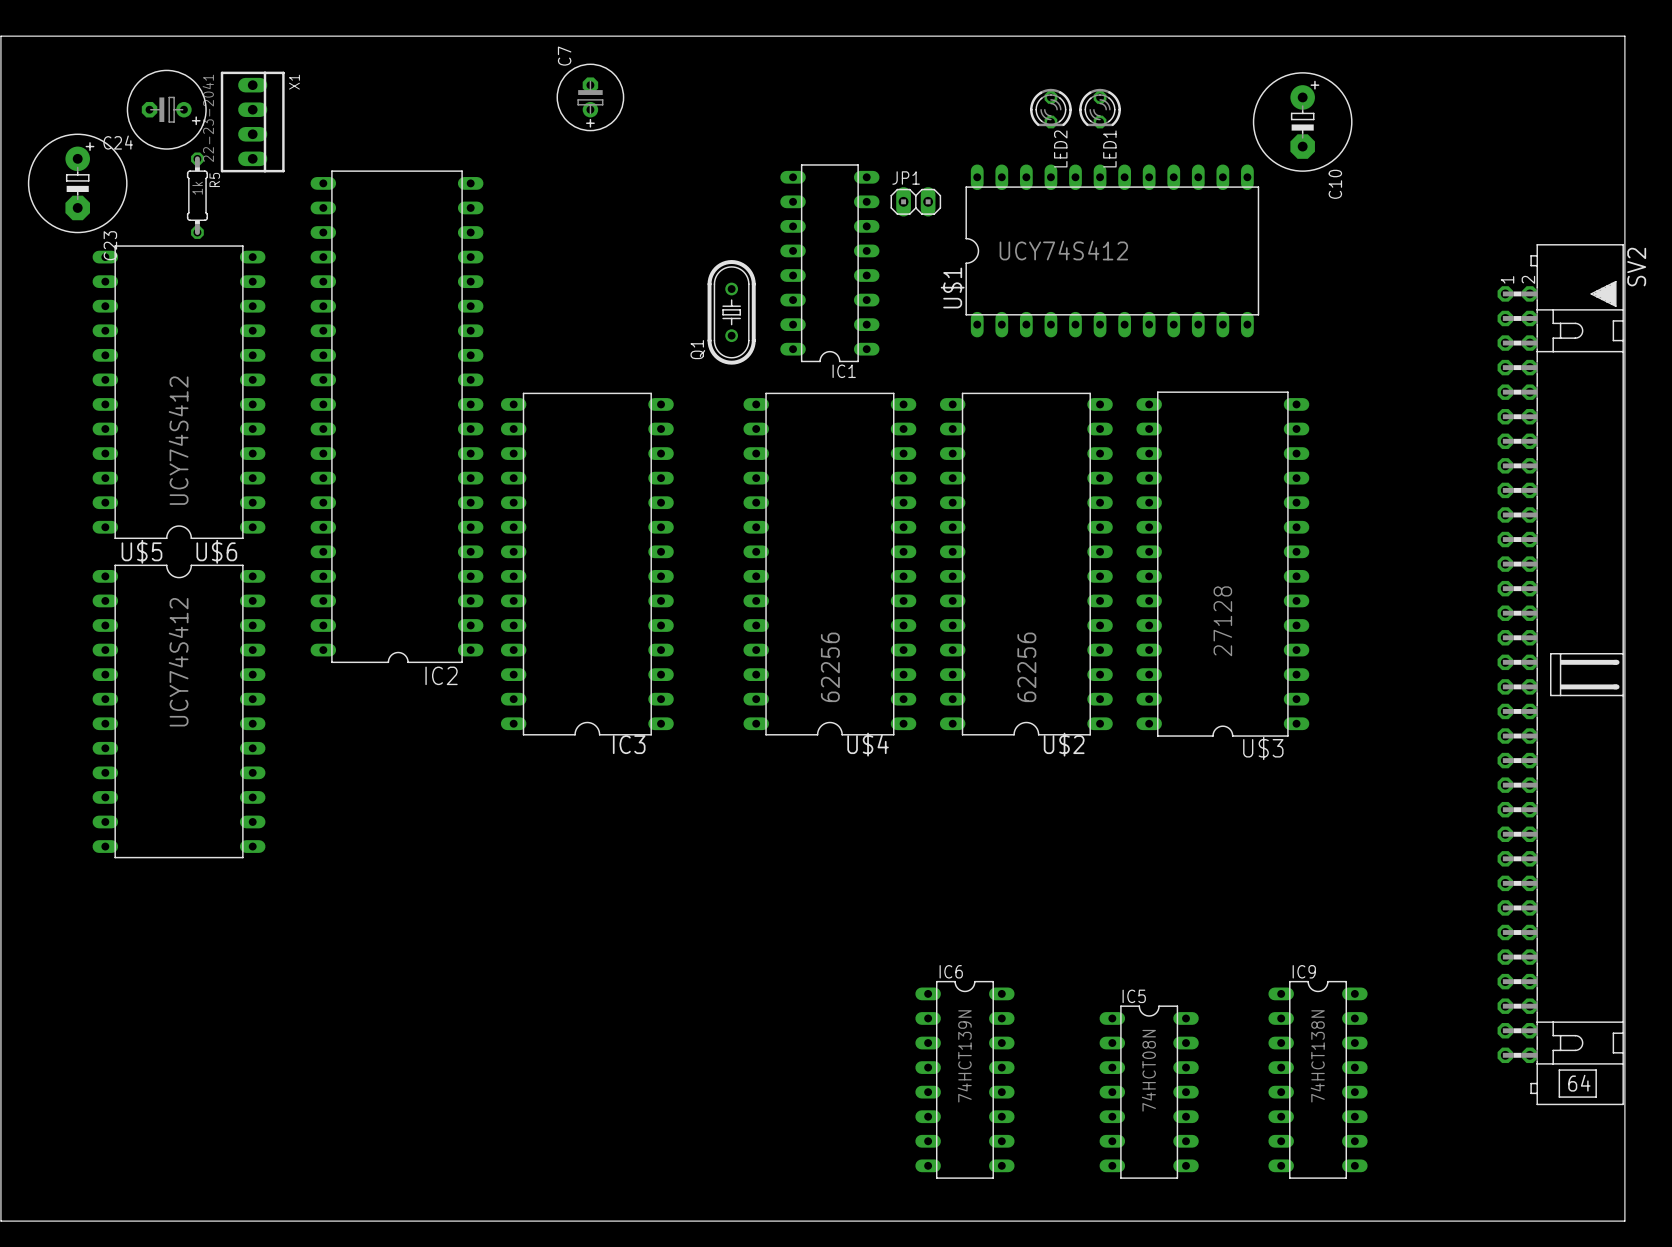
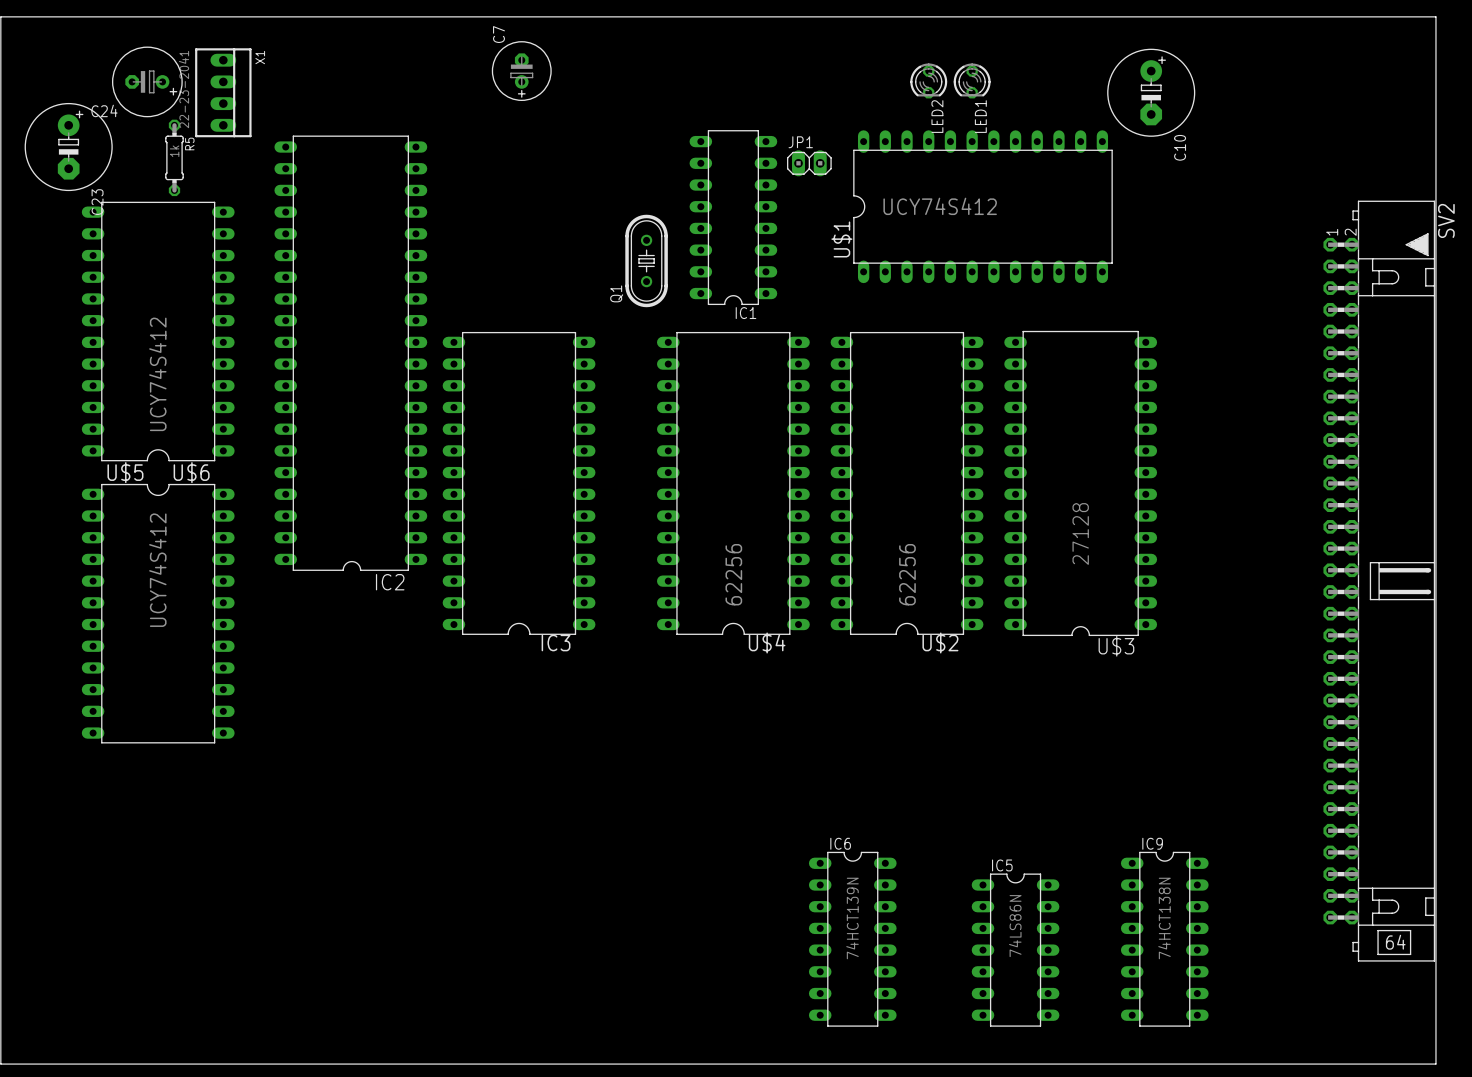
IC5 value: 74HCT08N (1148, 1070) -> 74LS86N (1015, 926)

